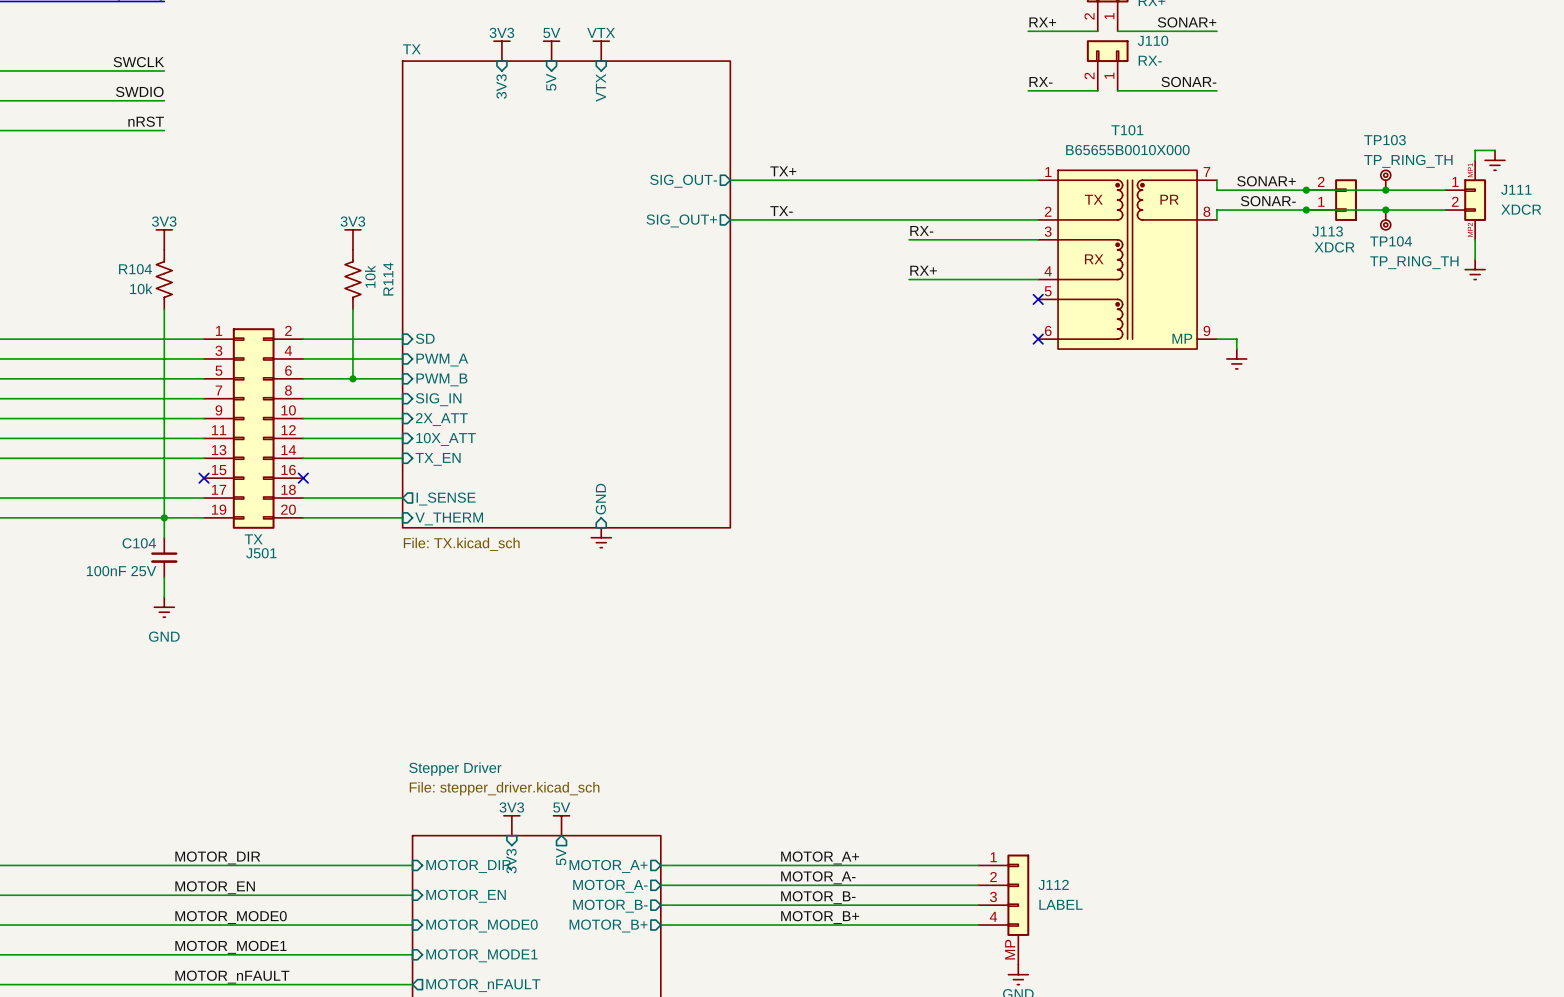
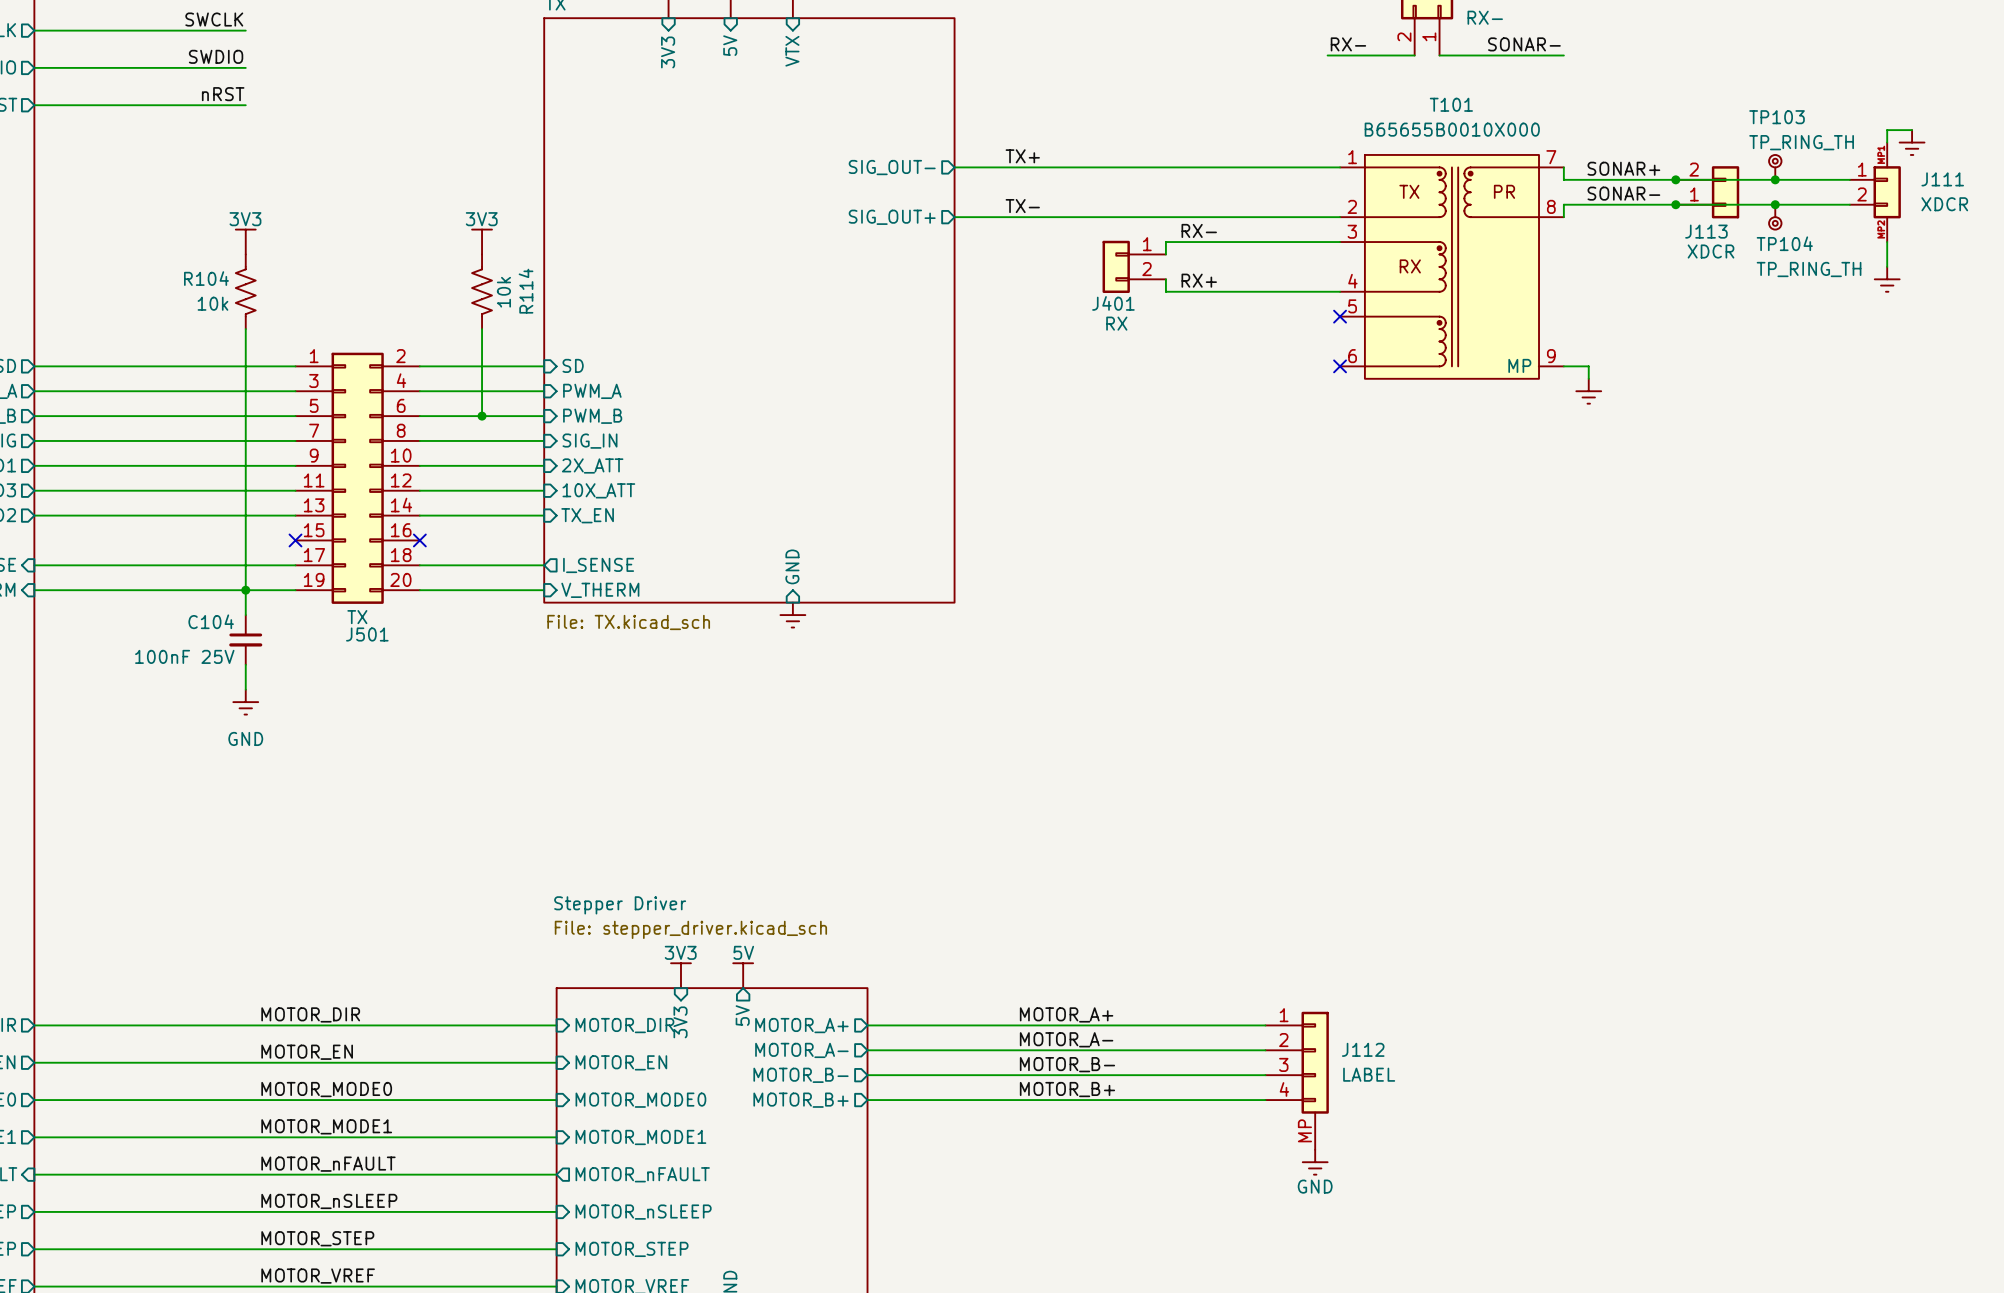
wire: none -> (1178, 242) (1165, 242) (1165, 254)
J401: none -> RX (1134, 266)
wire: none -> (1165, 279) (1165, 291) (1178, 291)

